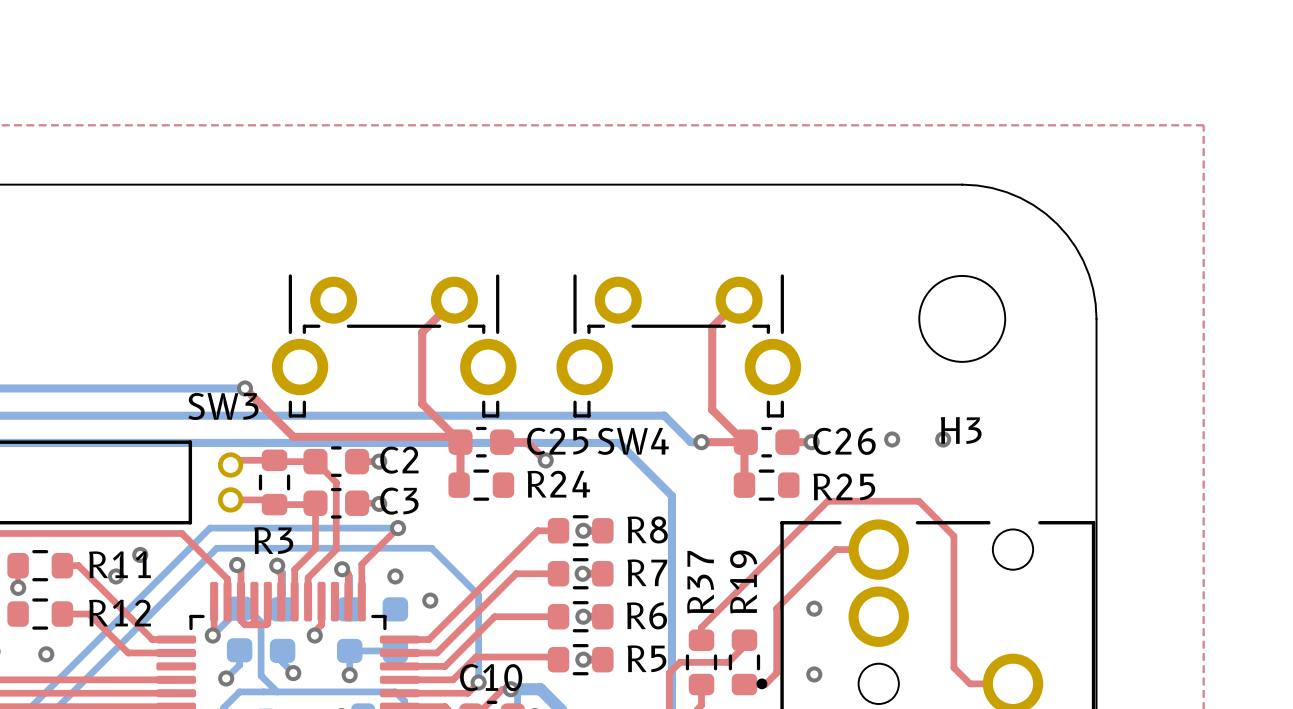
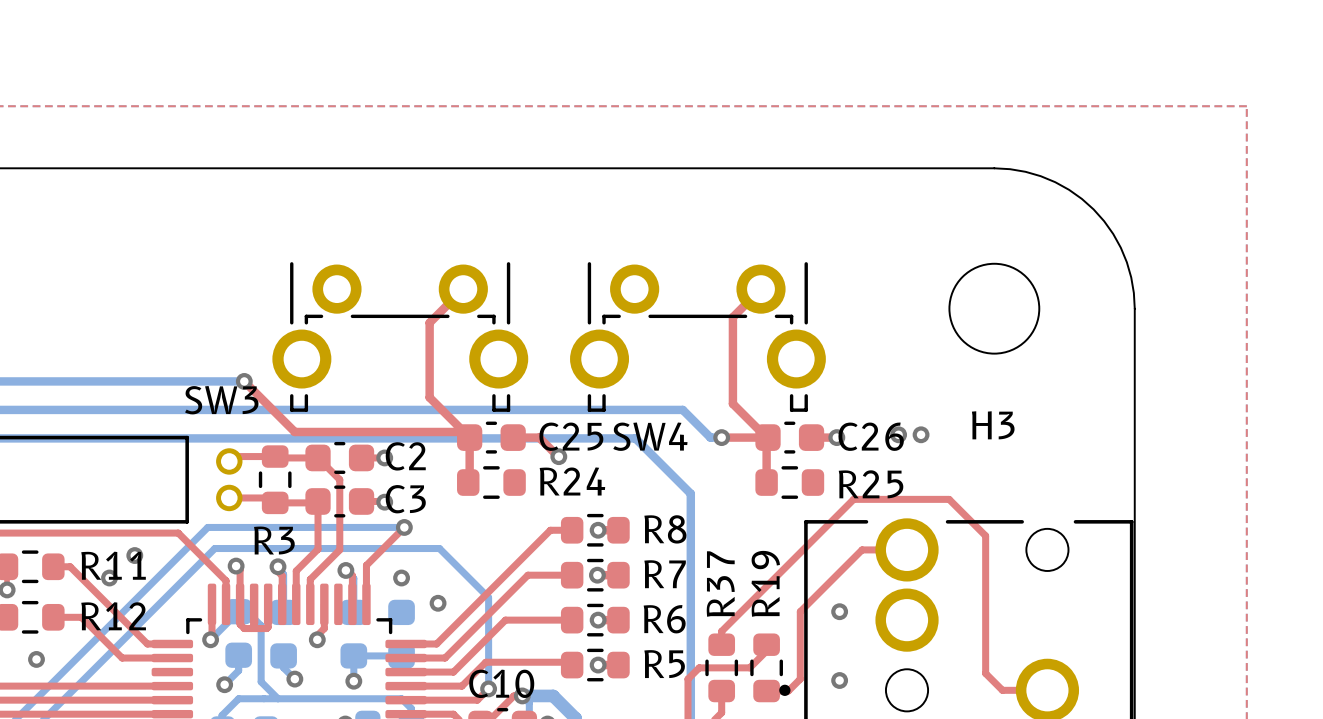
via position: (943, 439) -> (898, 434)

